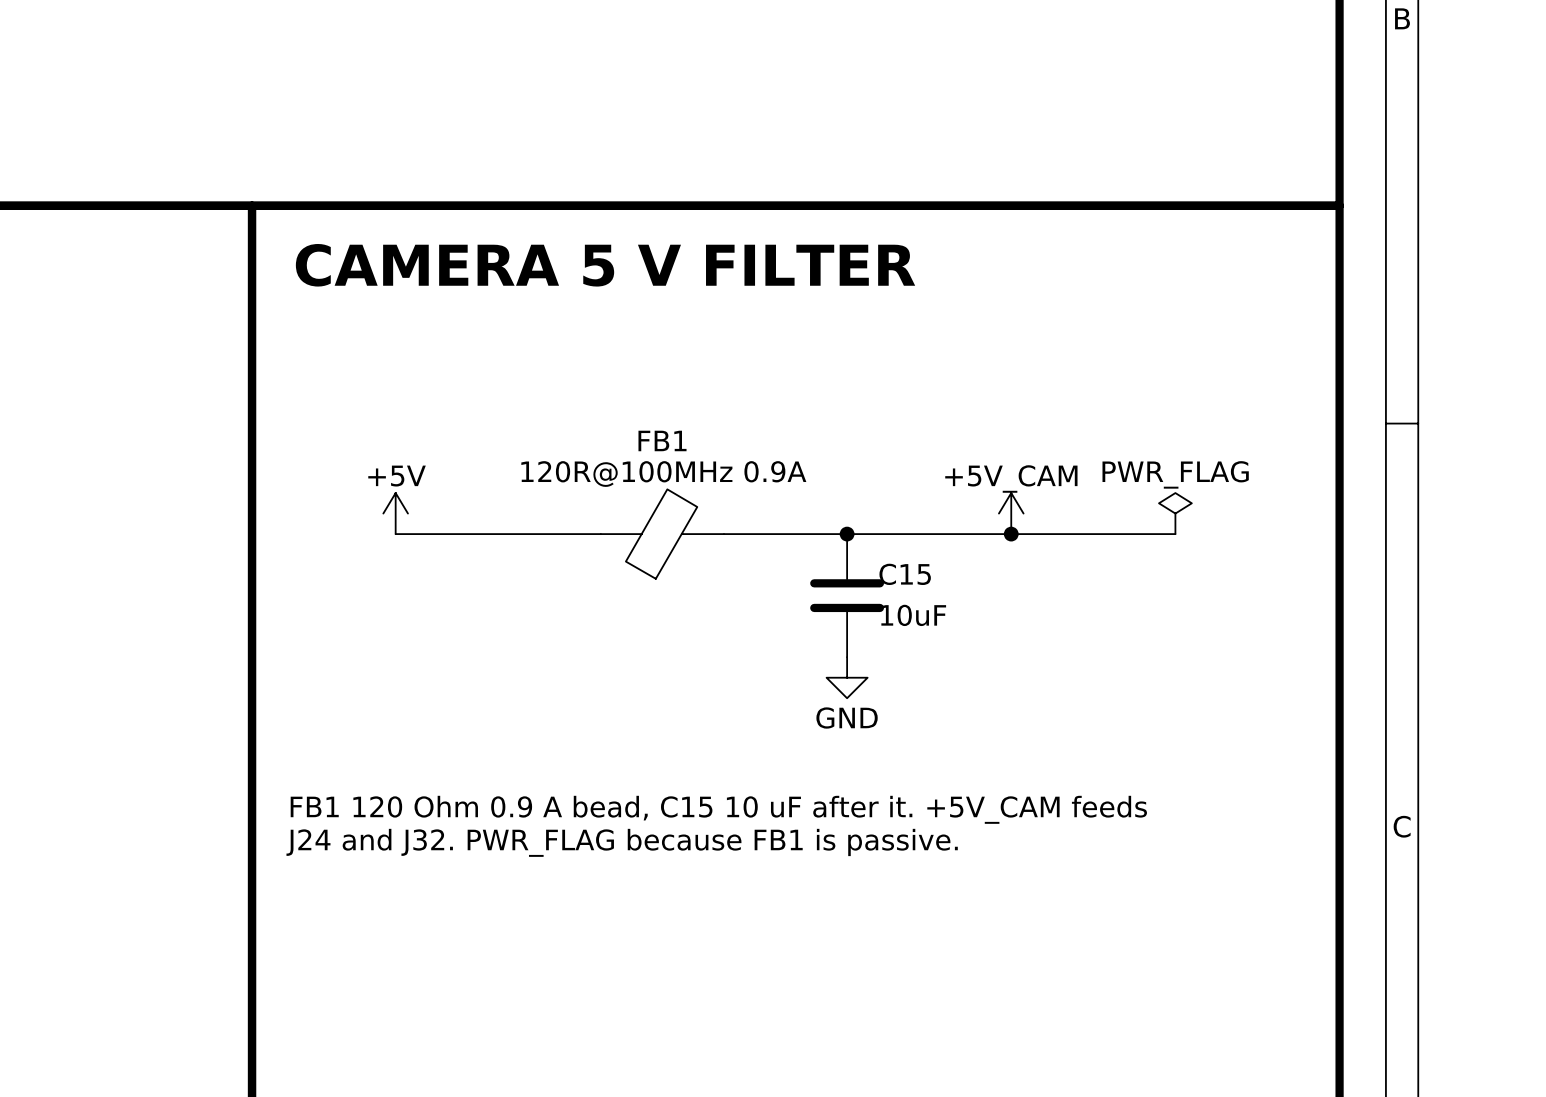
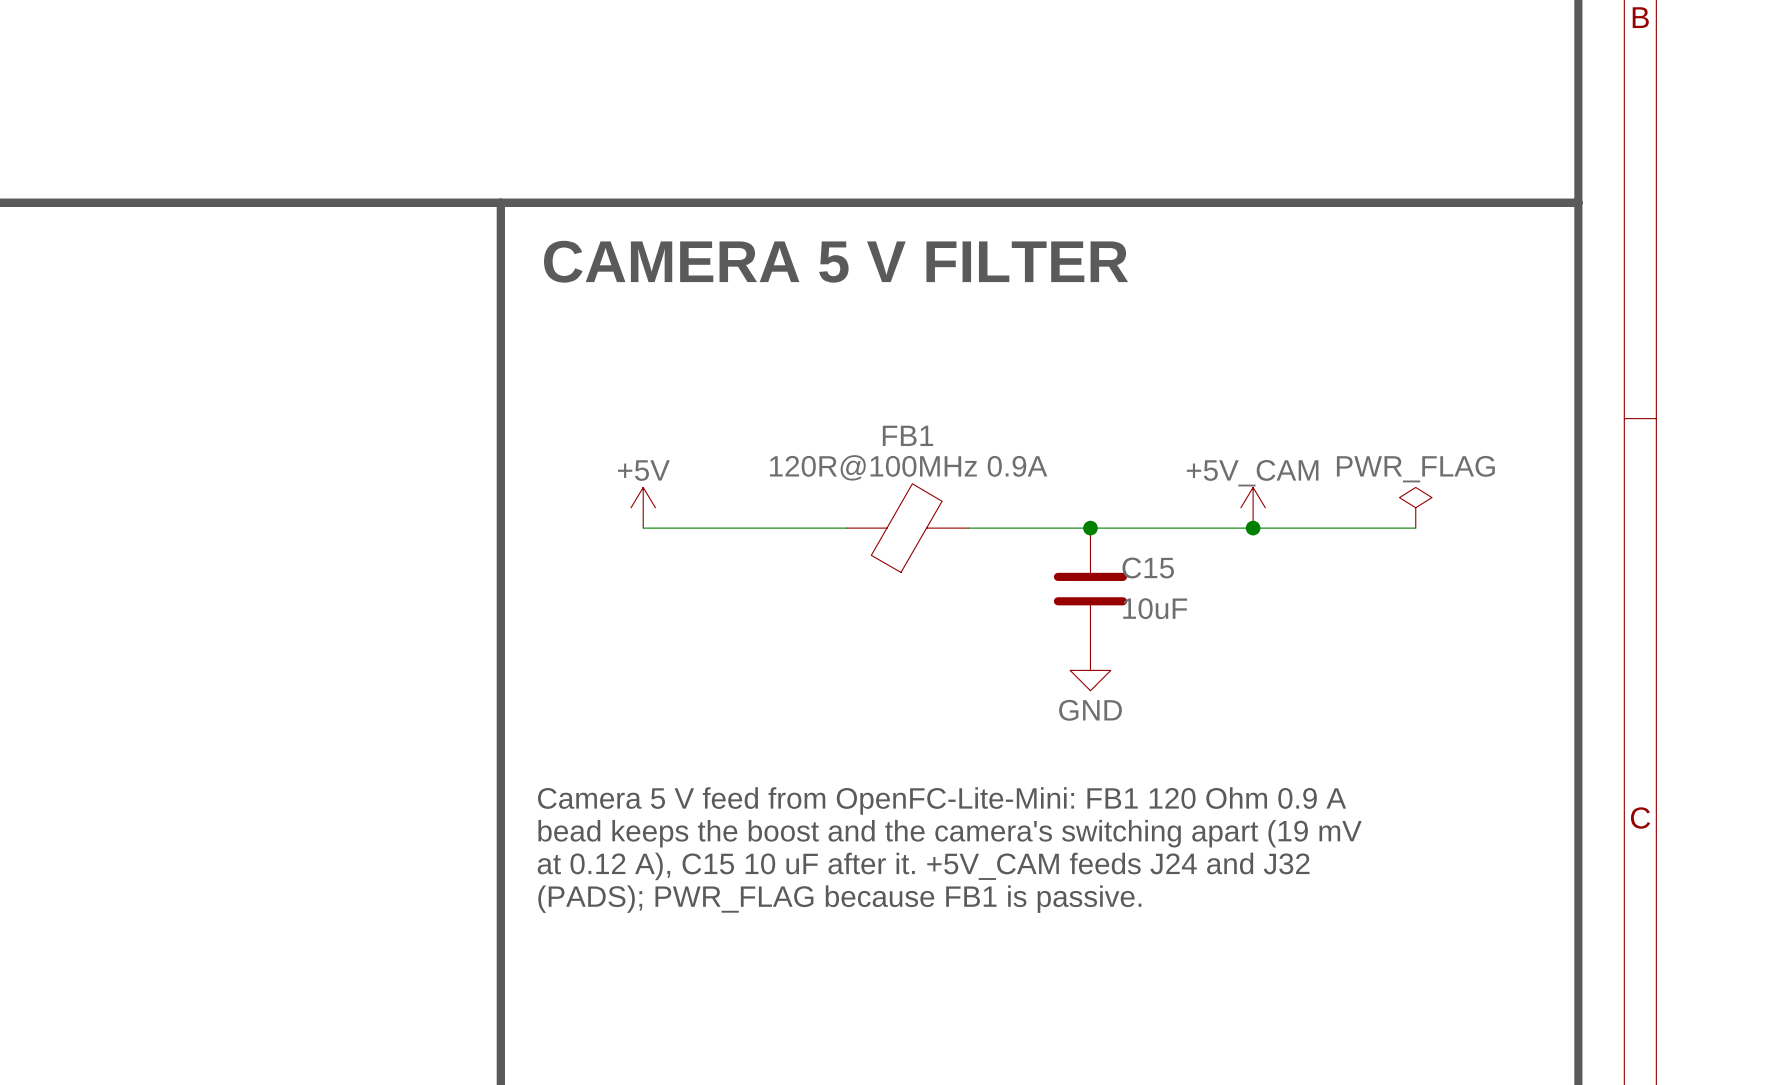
text: FB1 120 Ohm 0.9 A bead, C15 10 uF after it. +5V_CAM feeds (718, 809) -> Camera 5 V feed from OpenFC-Lite-Mini: FB1 120 Ohm 0.9 A (942, 800)
text: J24 and J32. PWR_FLAG because FB1 is passive. (622, 842) -> bead keeps the boost and the camera's switching apart (19 mV (950, 833)
text: none -> at 0.12 A), C15 10 uF after it. +5V_CAM feeds J24 and J32 (923, 866)
text: none -> (PADS); PWR_FLAG because FB1 is passive. (839, 899)

